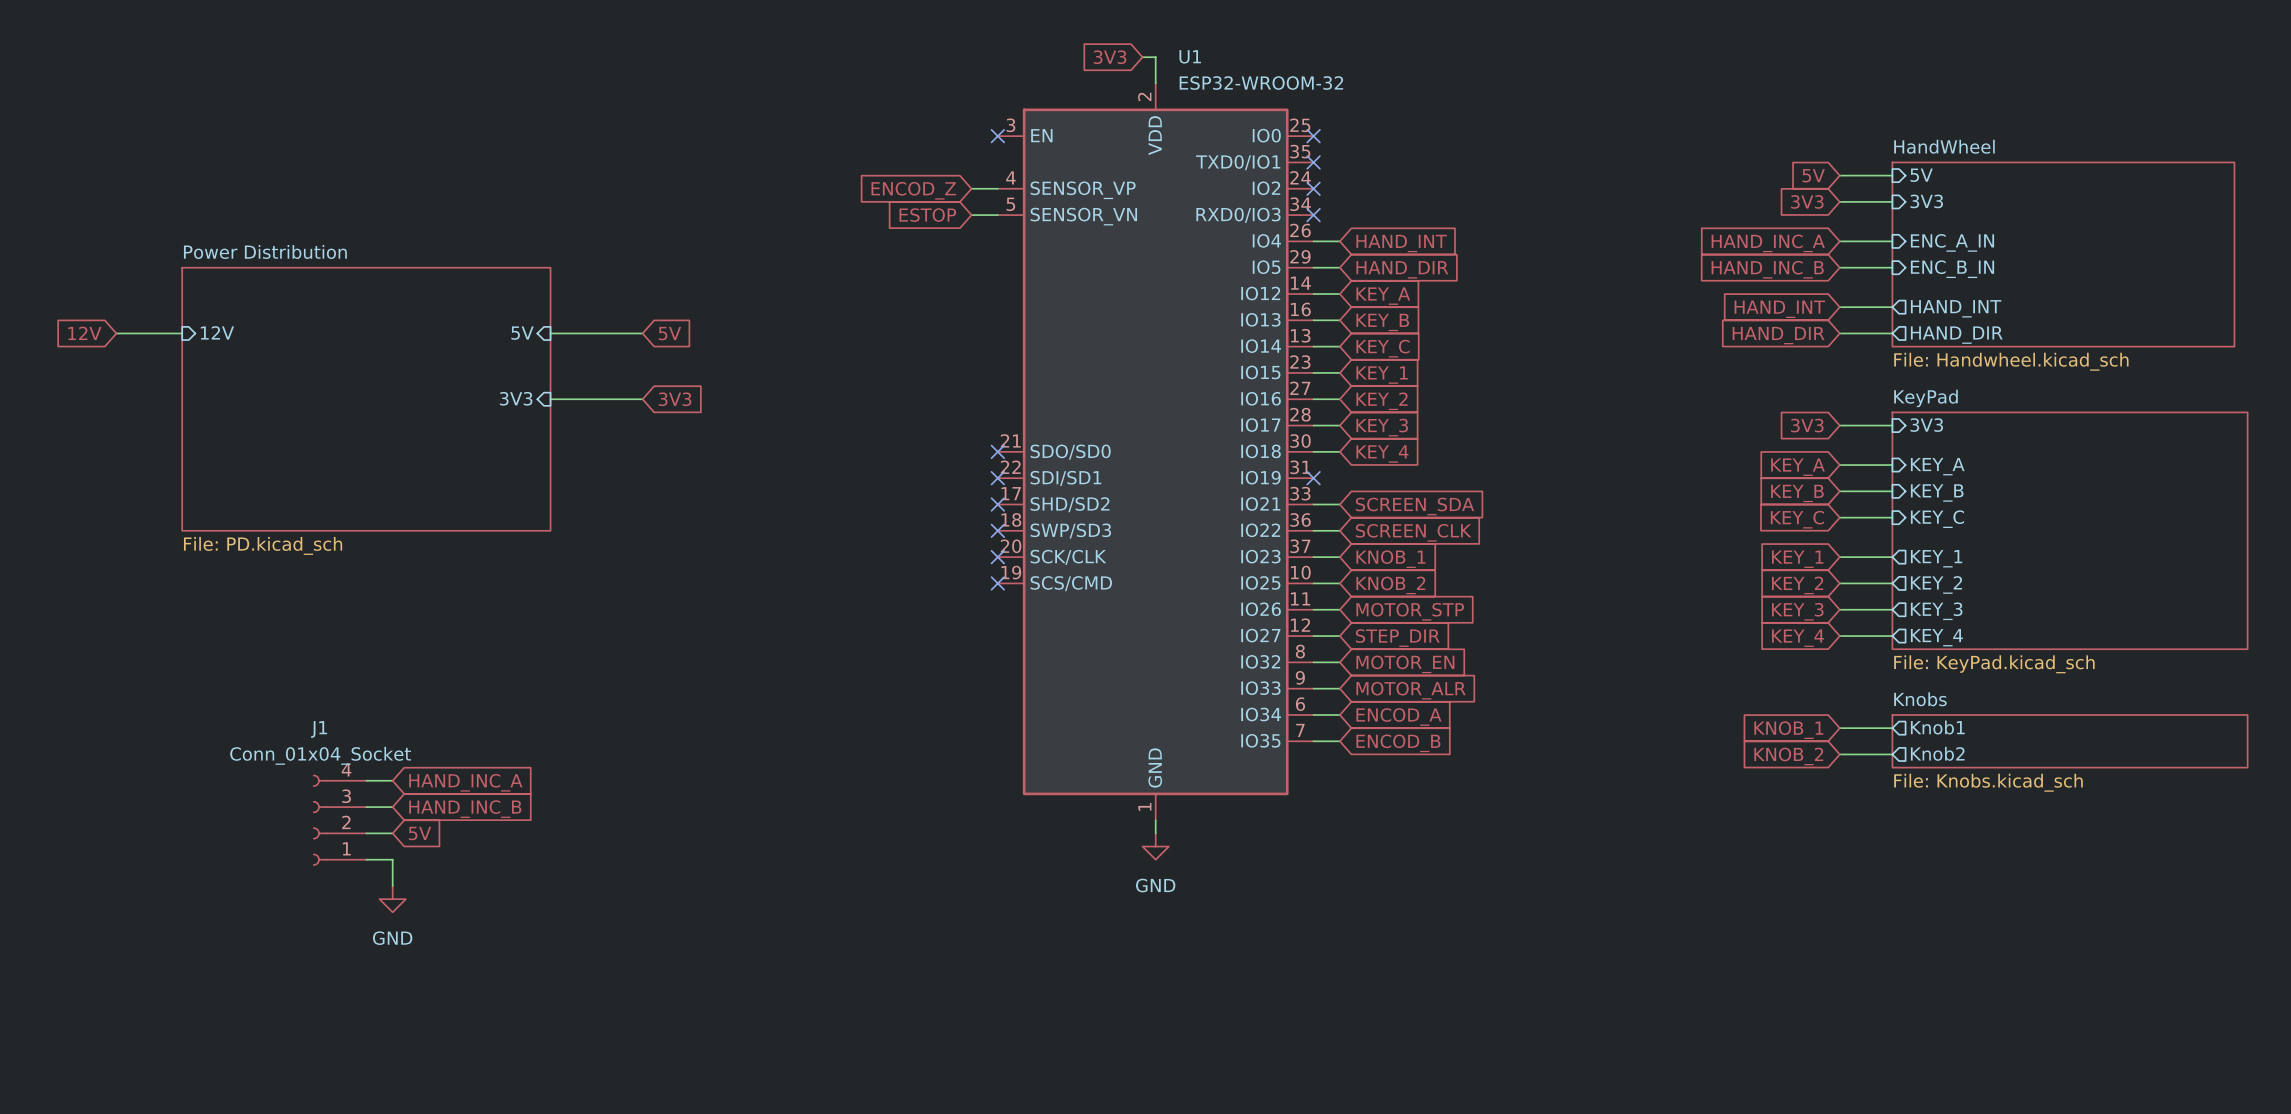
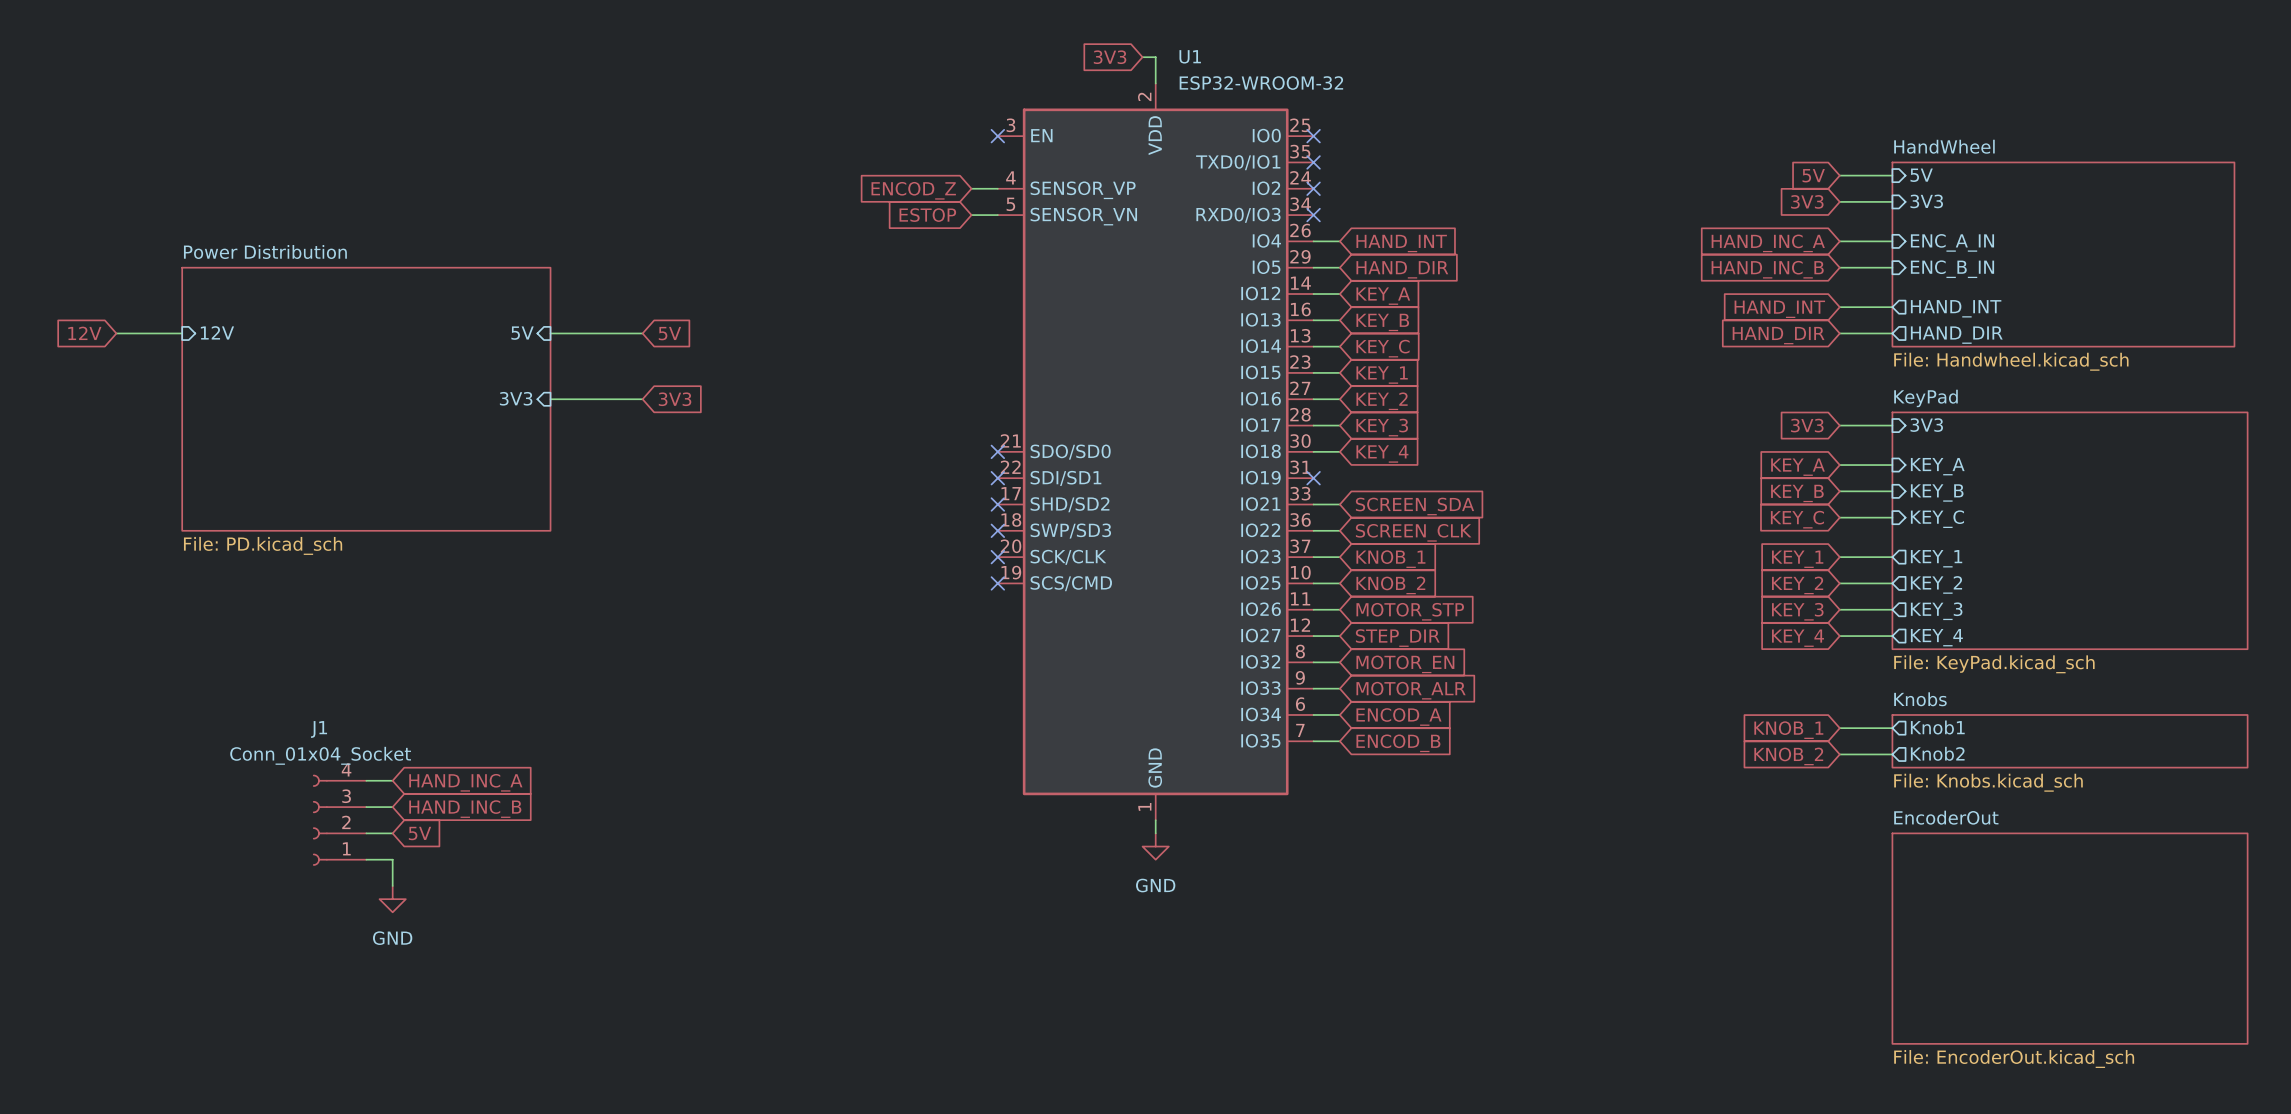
sheet EncoderOut: none -> File: EncoderOut.kicad_sch (2070, 938)

